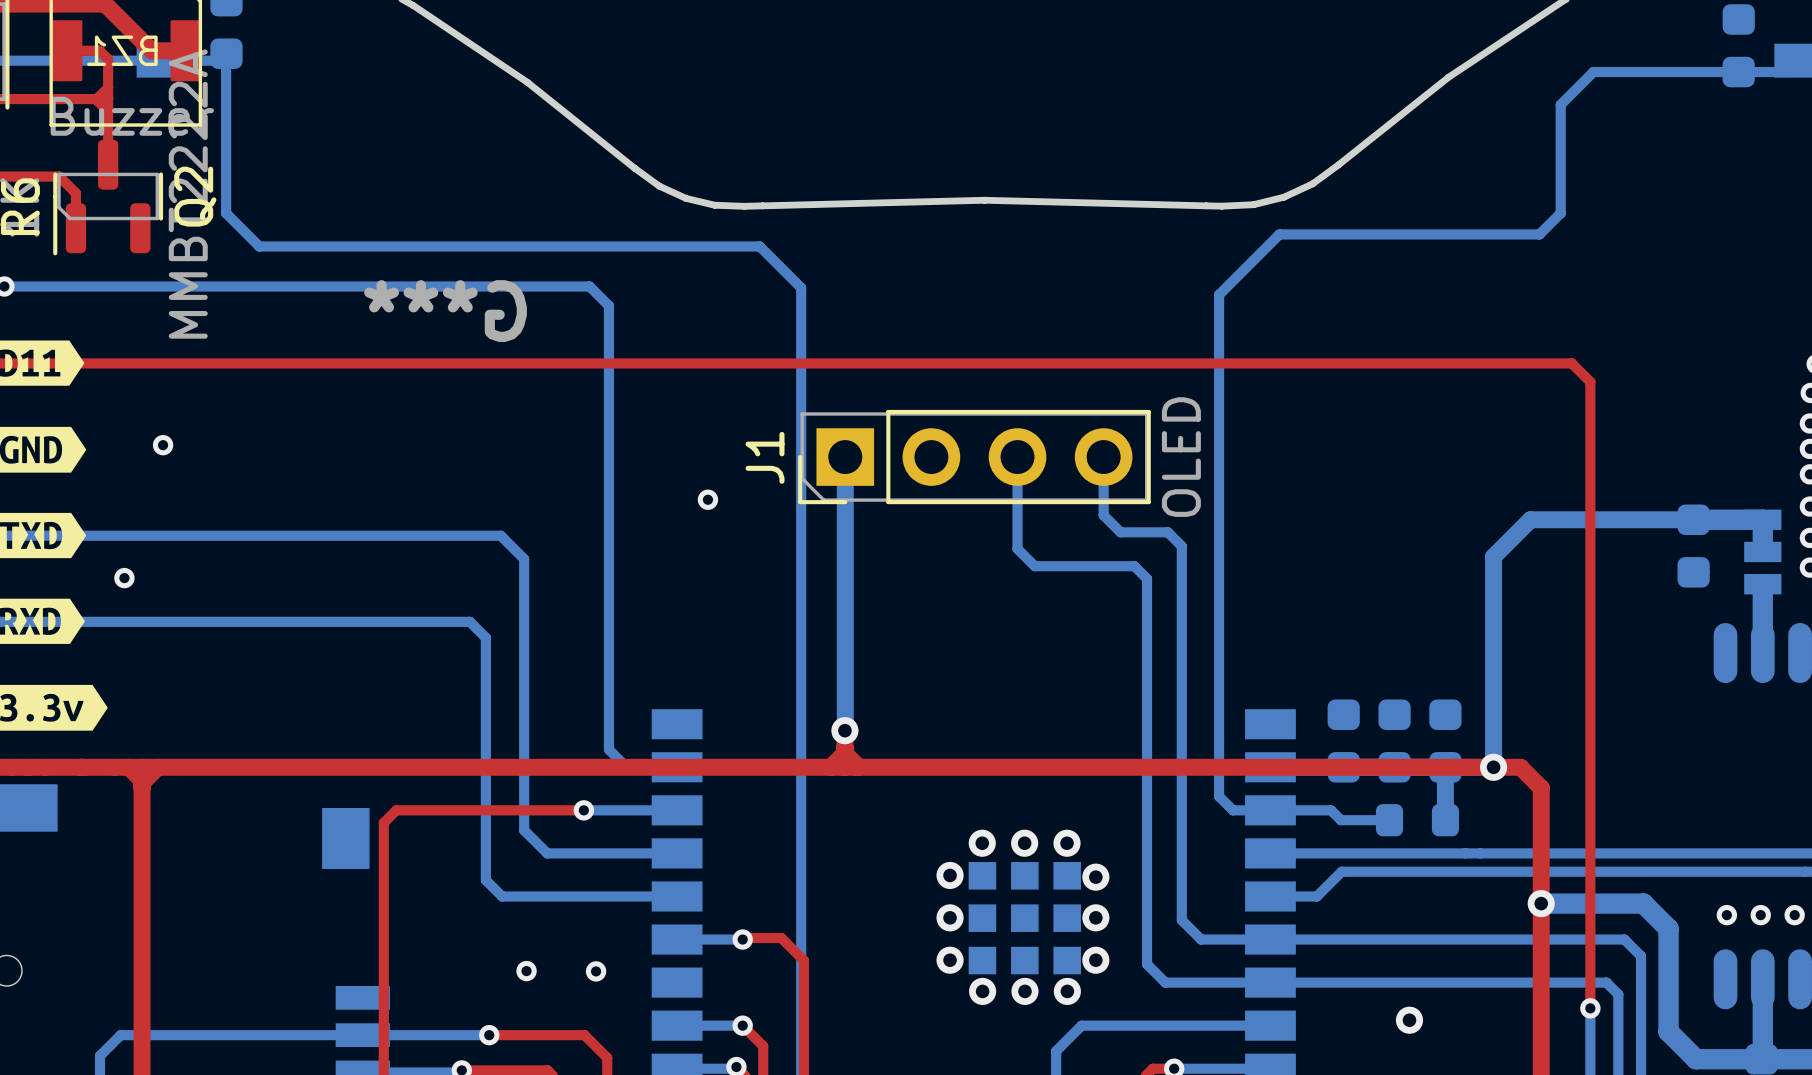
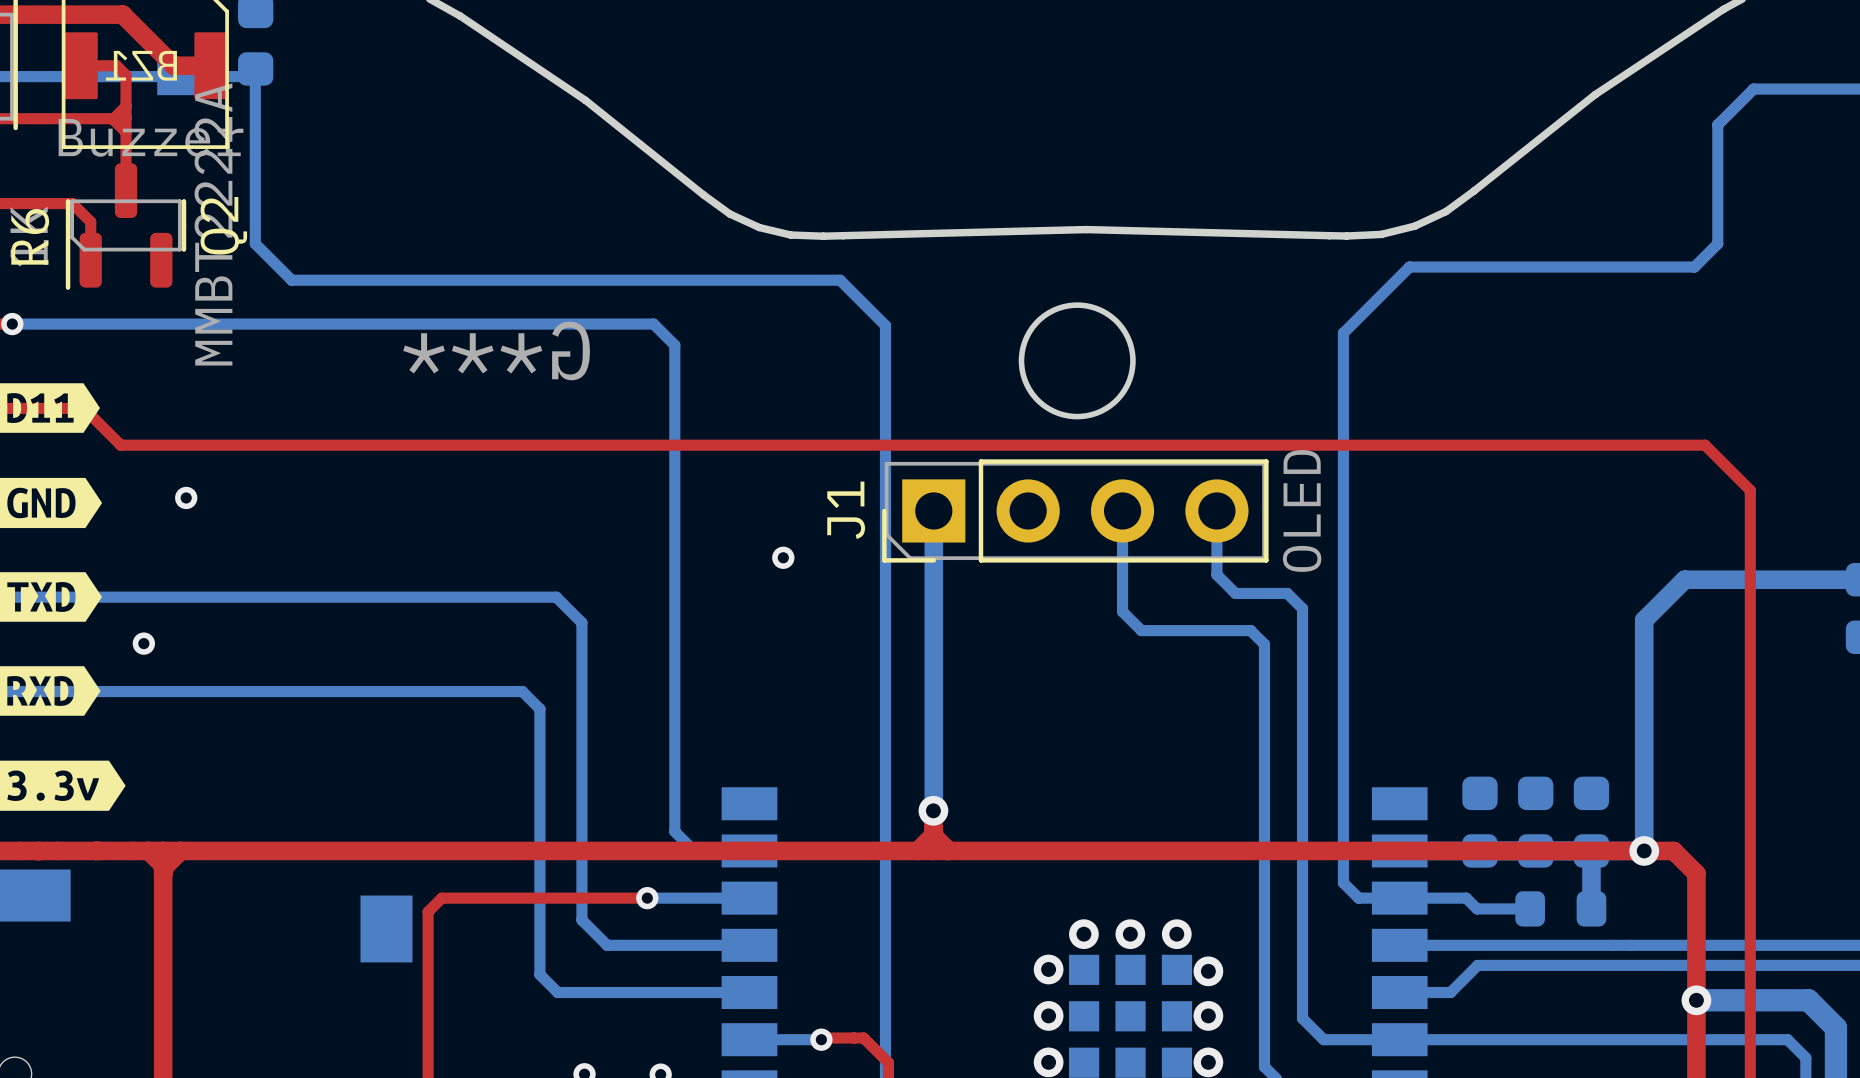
round board edge: none -> [1018, 302, 1136, 420]
top track: (69, 363) (1571, 363) (1590, 381) (1590, 438) -> (84, 408) (120, 445) (1705, 445) (1750, 490)

